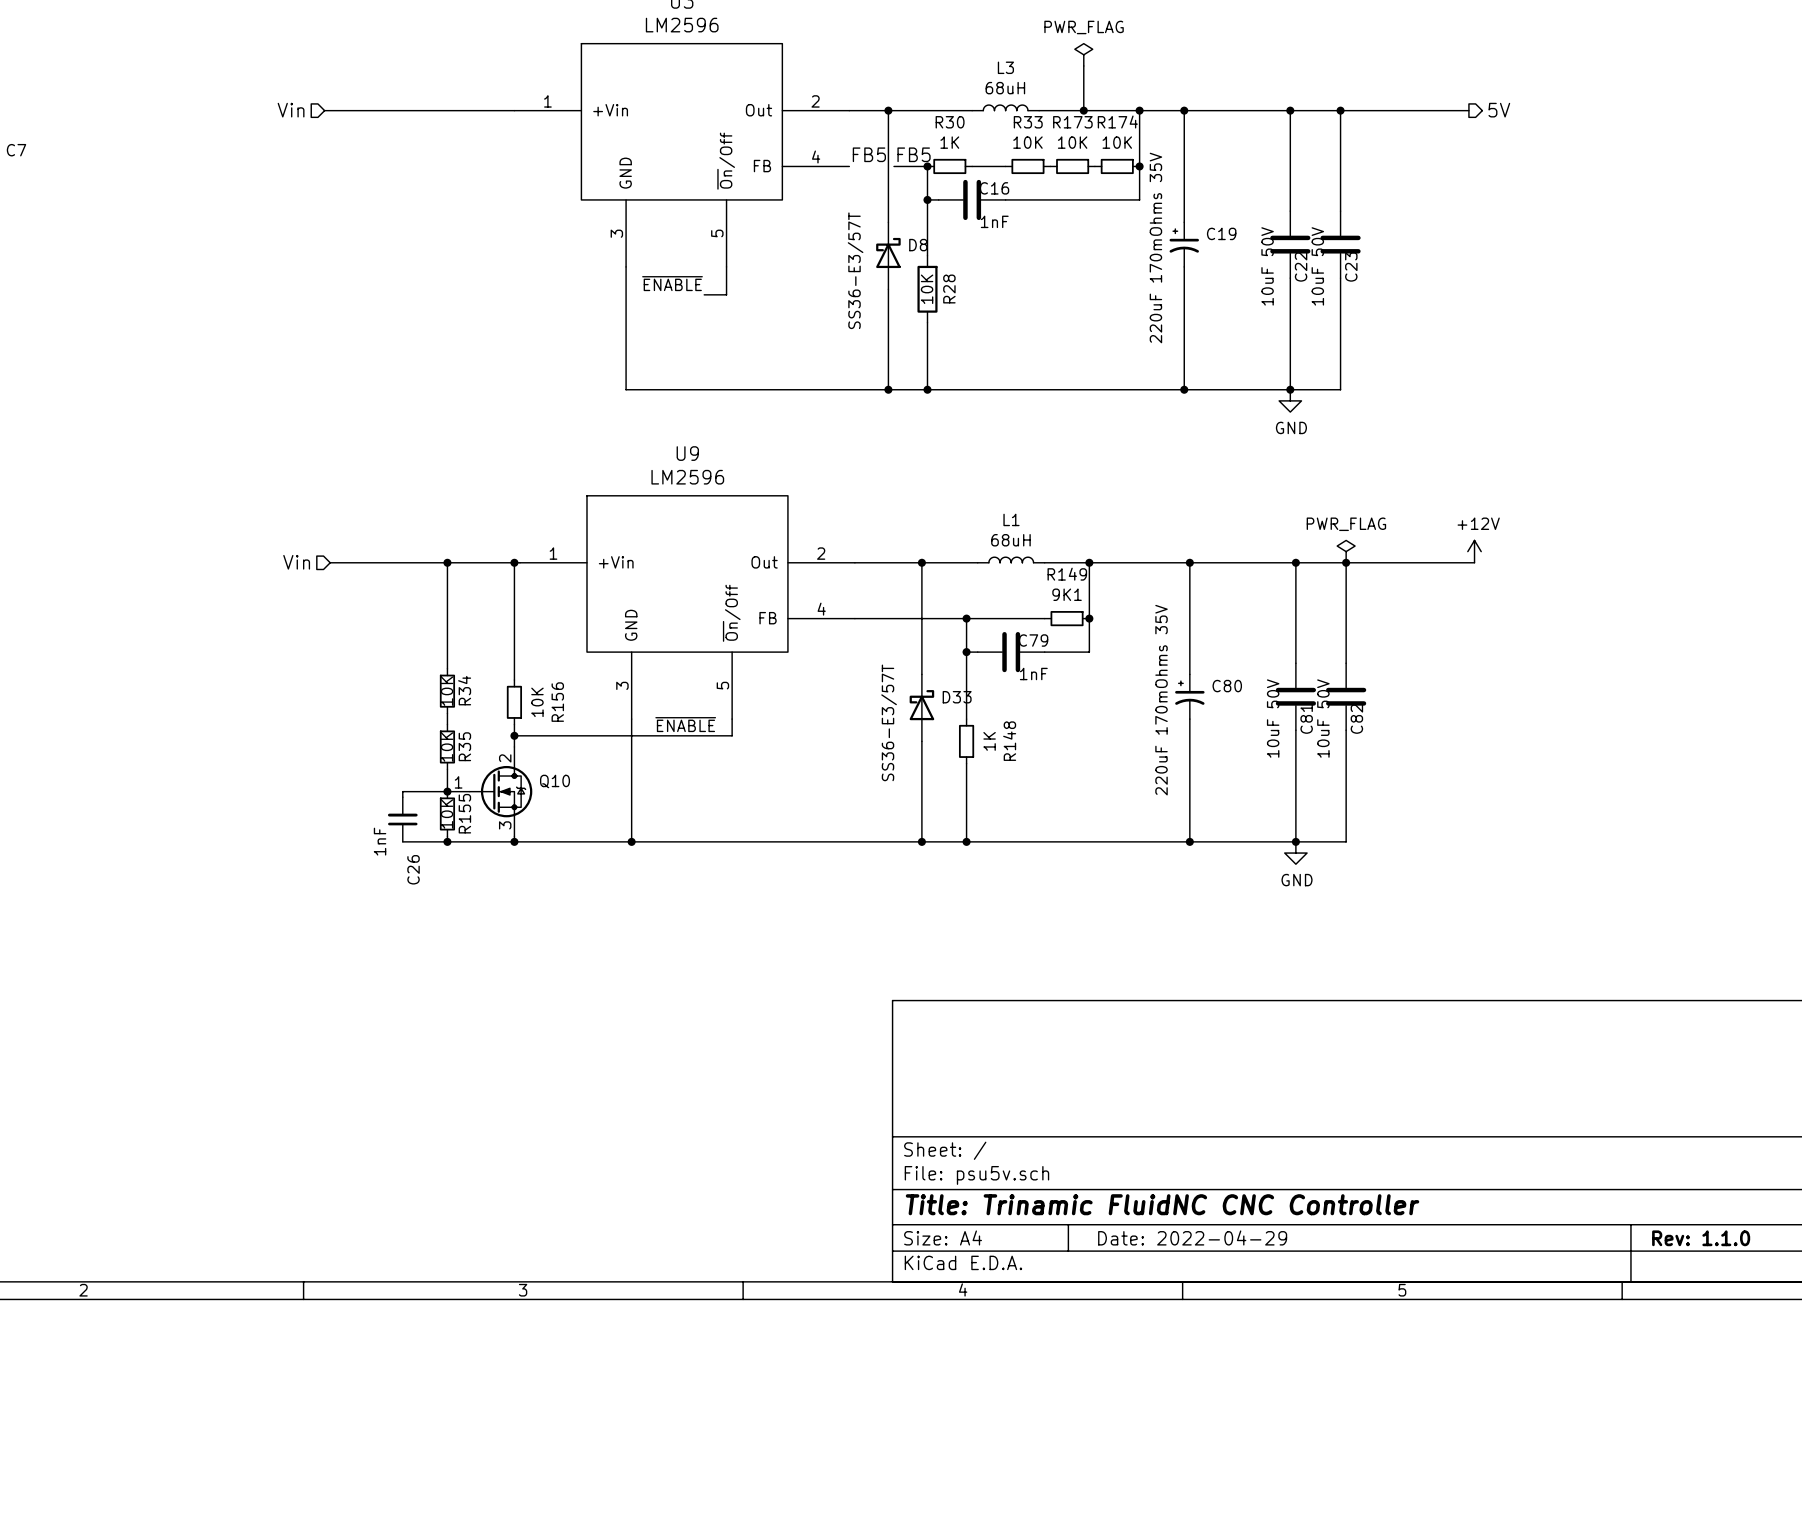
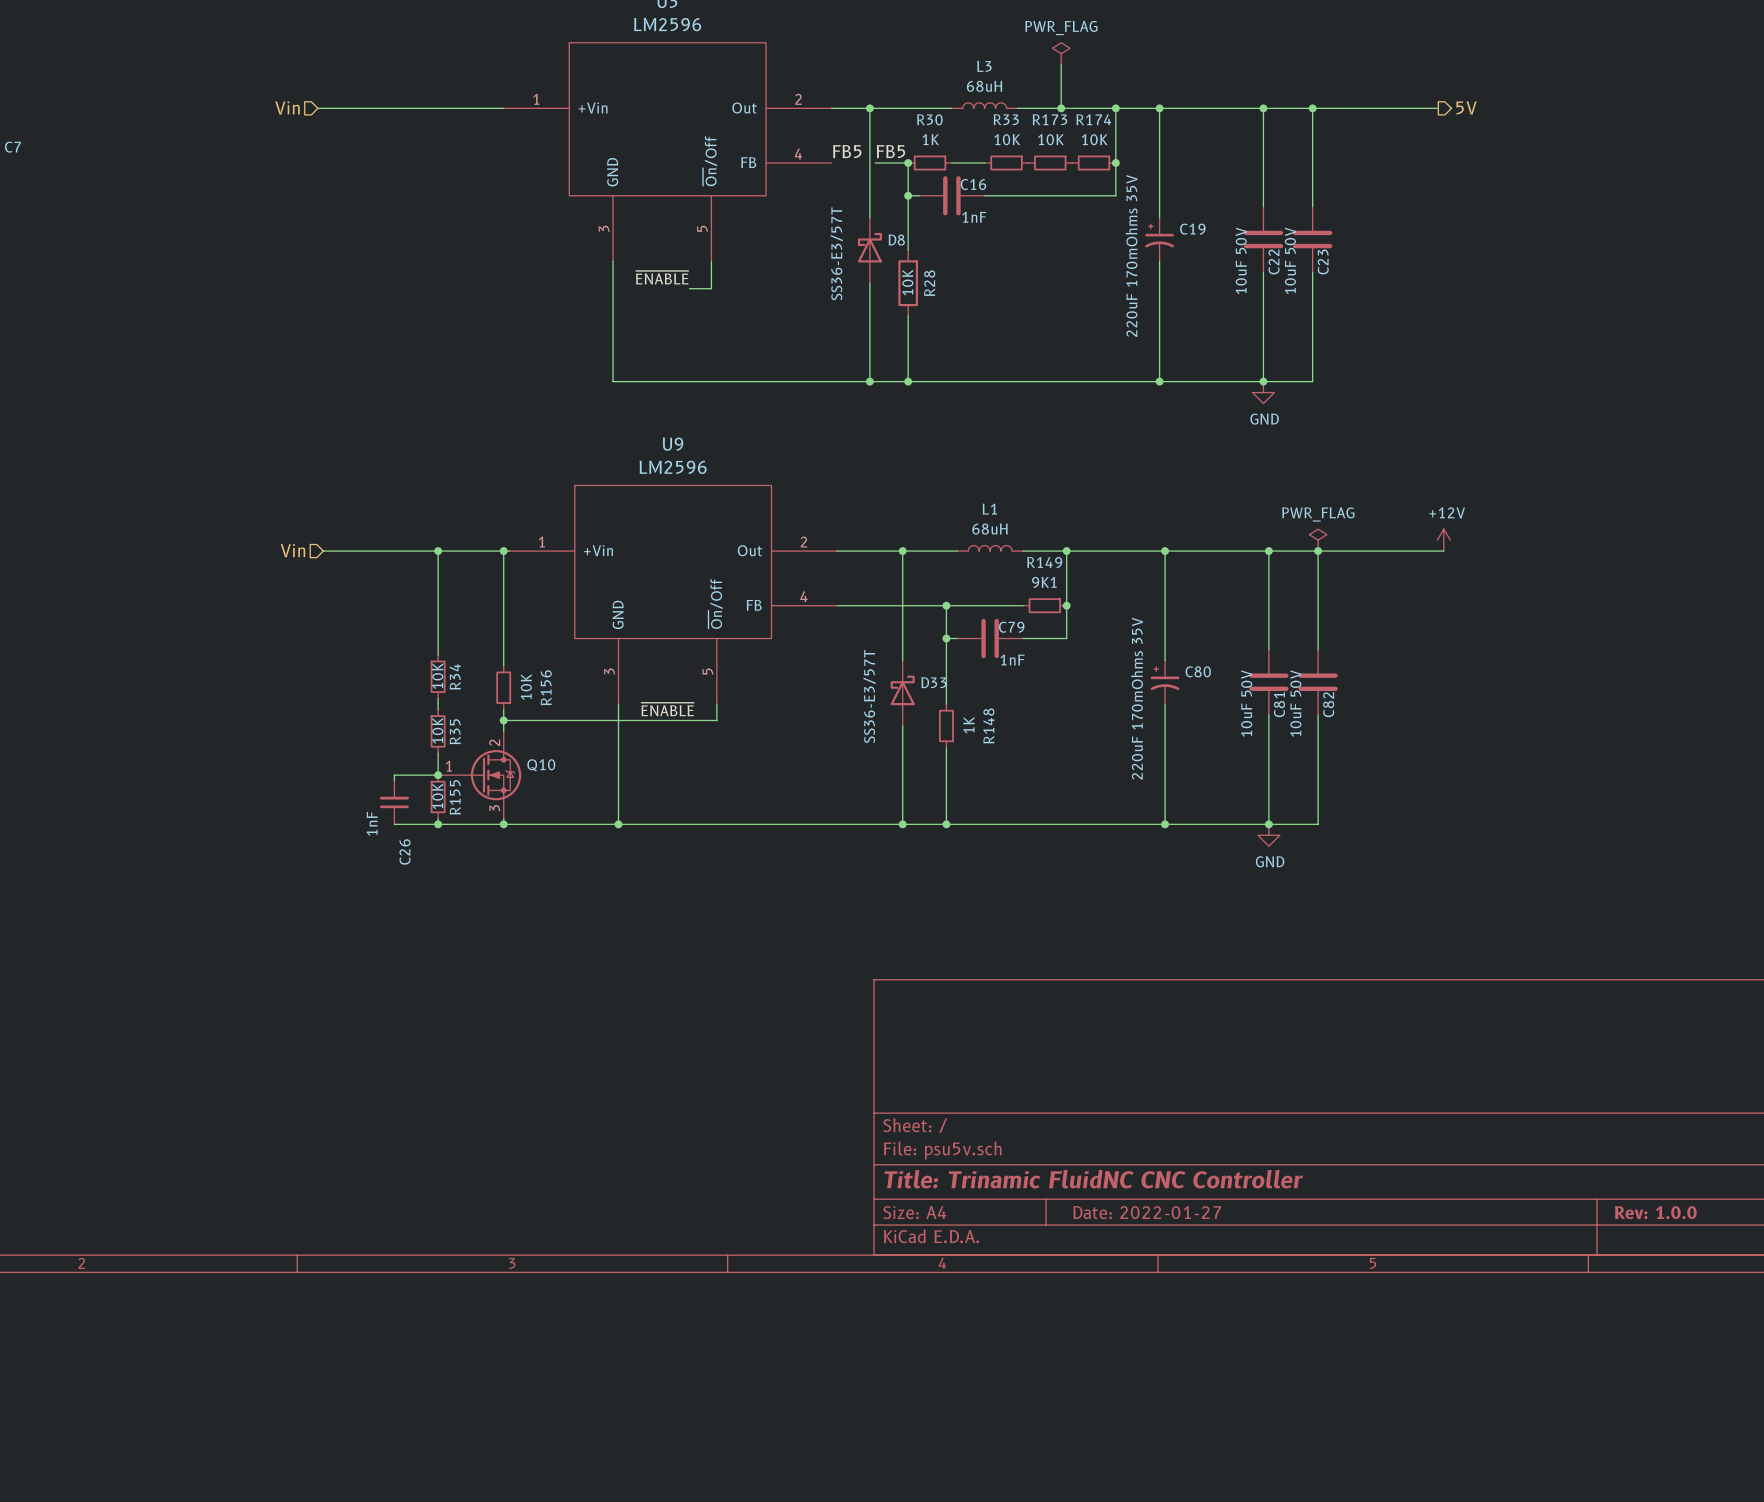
title block: Date: 2022-04-29 (1192, 1237) -> Date: 2022-01-27 (1147, 1212)
title block: Rev: 1.1.0 (1701, 1238) -> Rev: 1.0.0 (1655, 1212)

